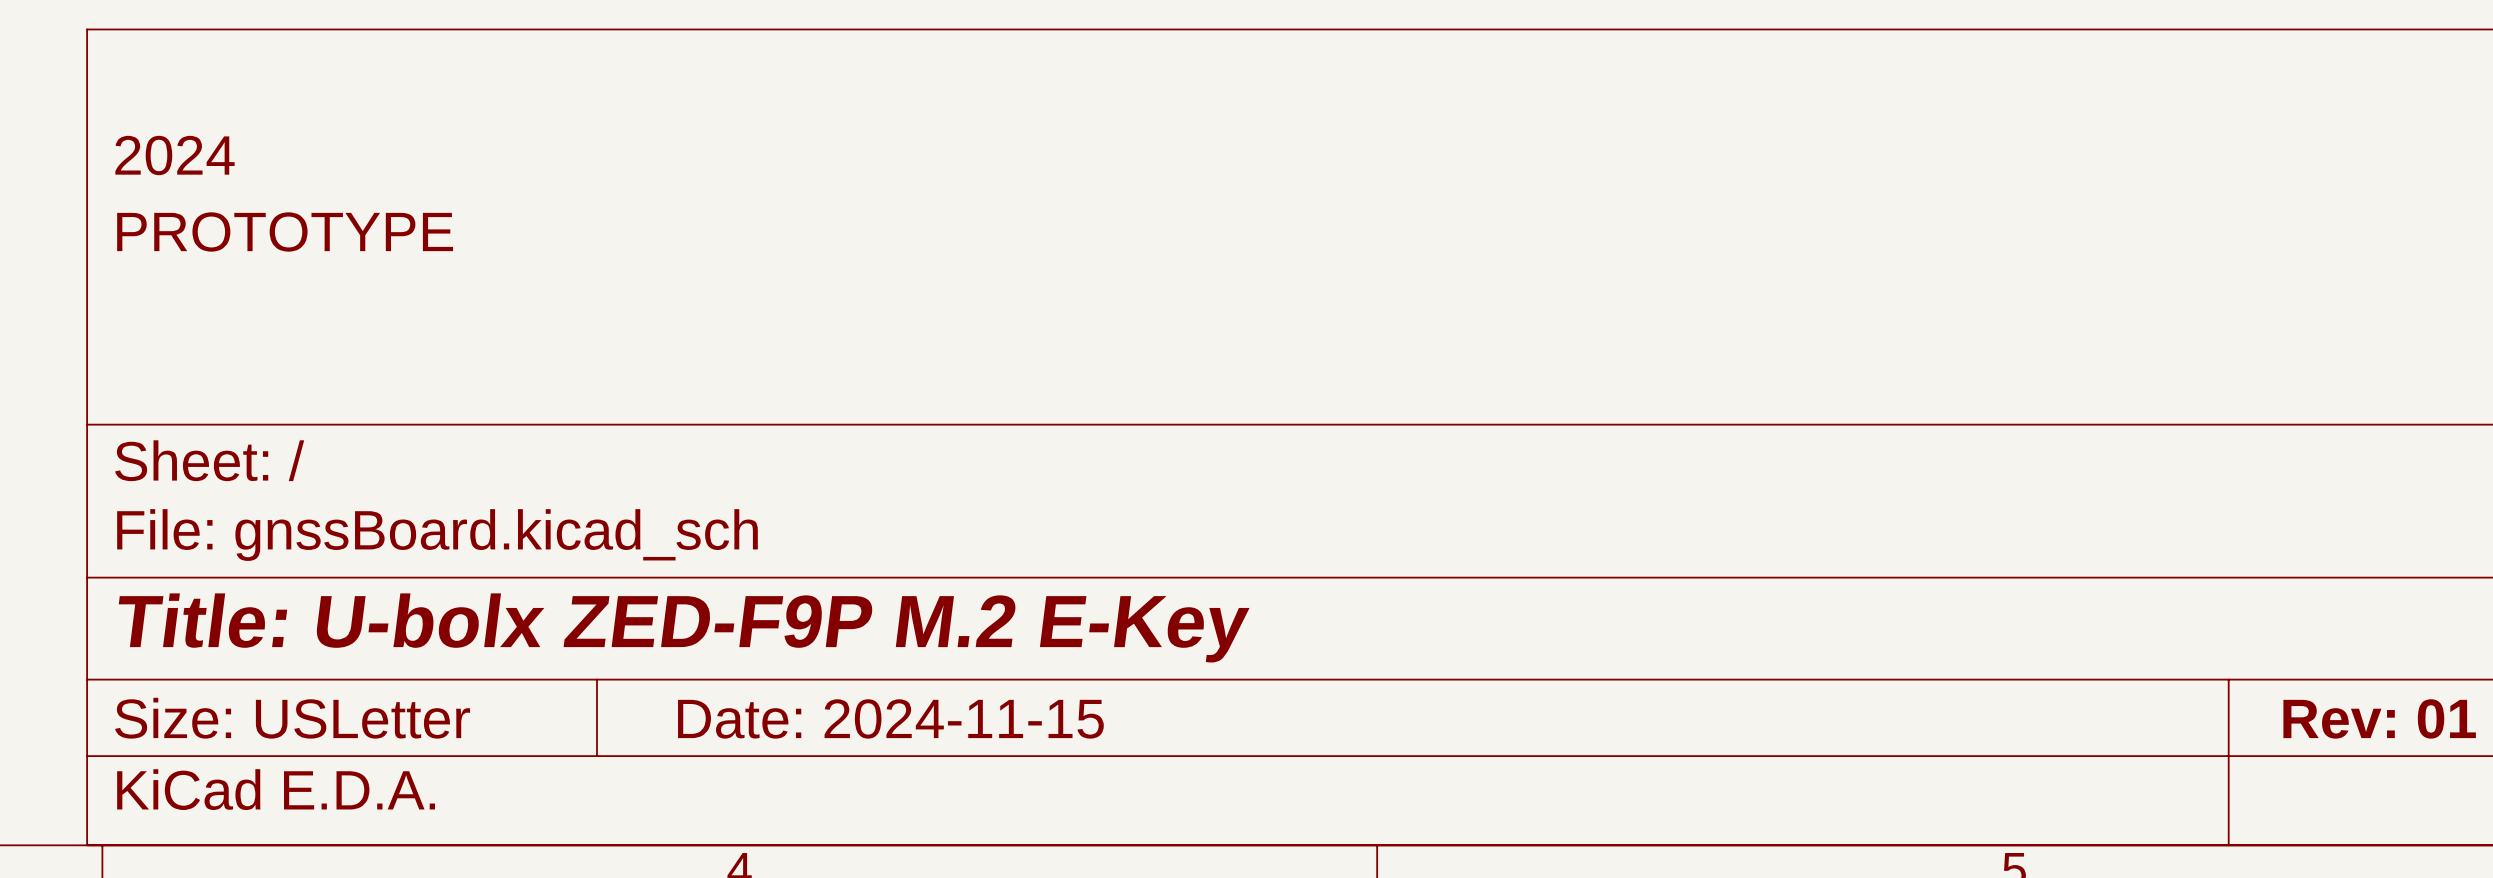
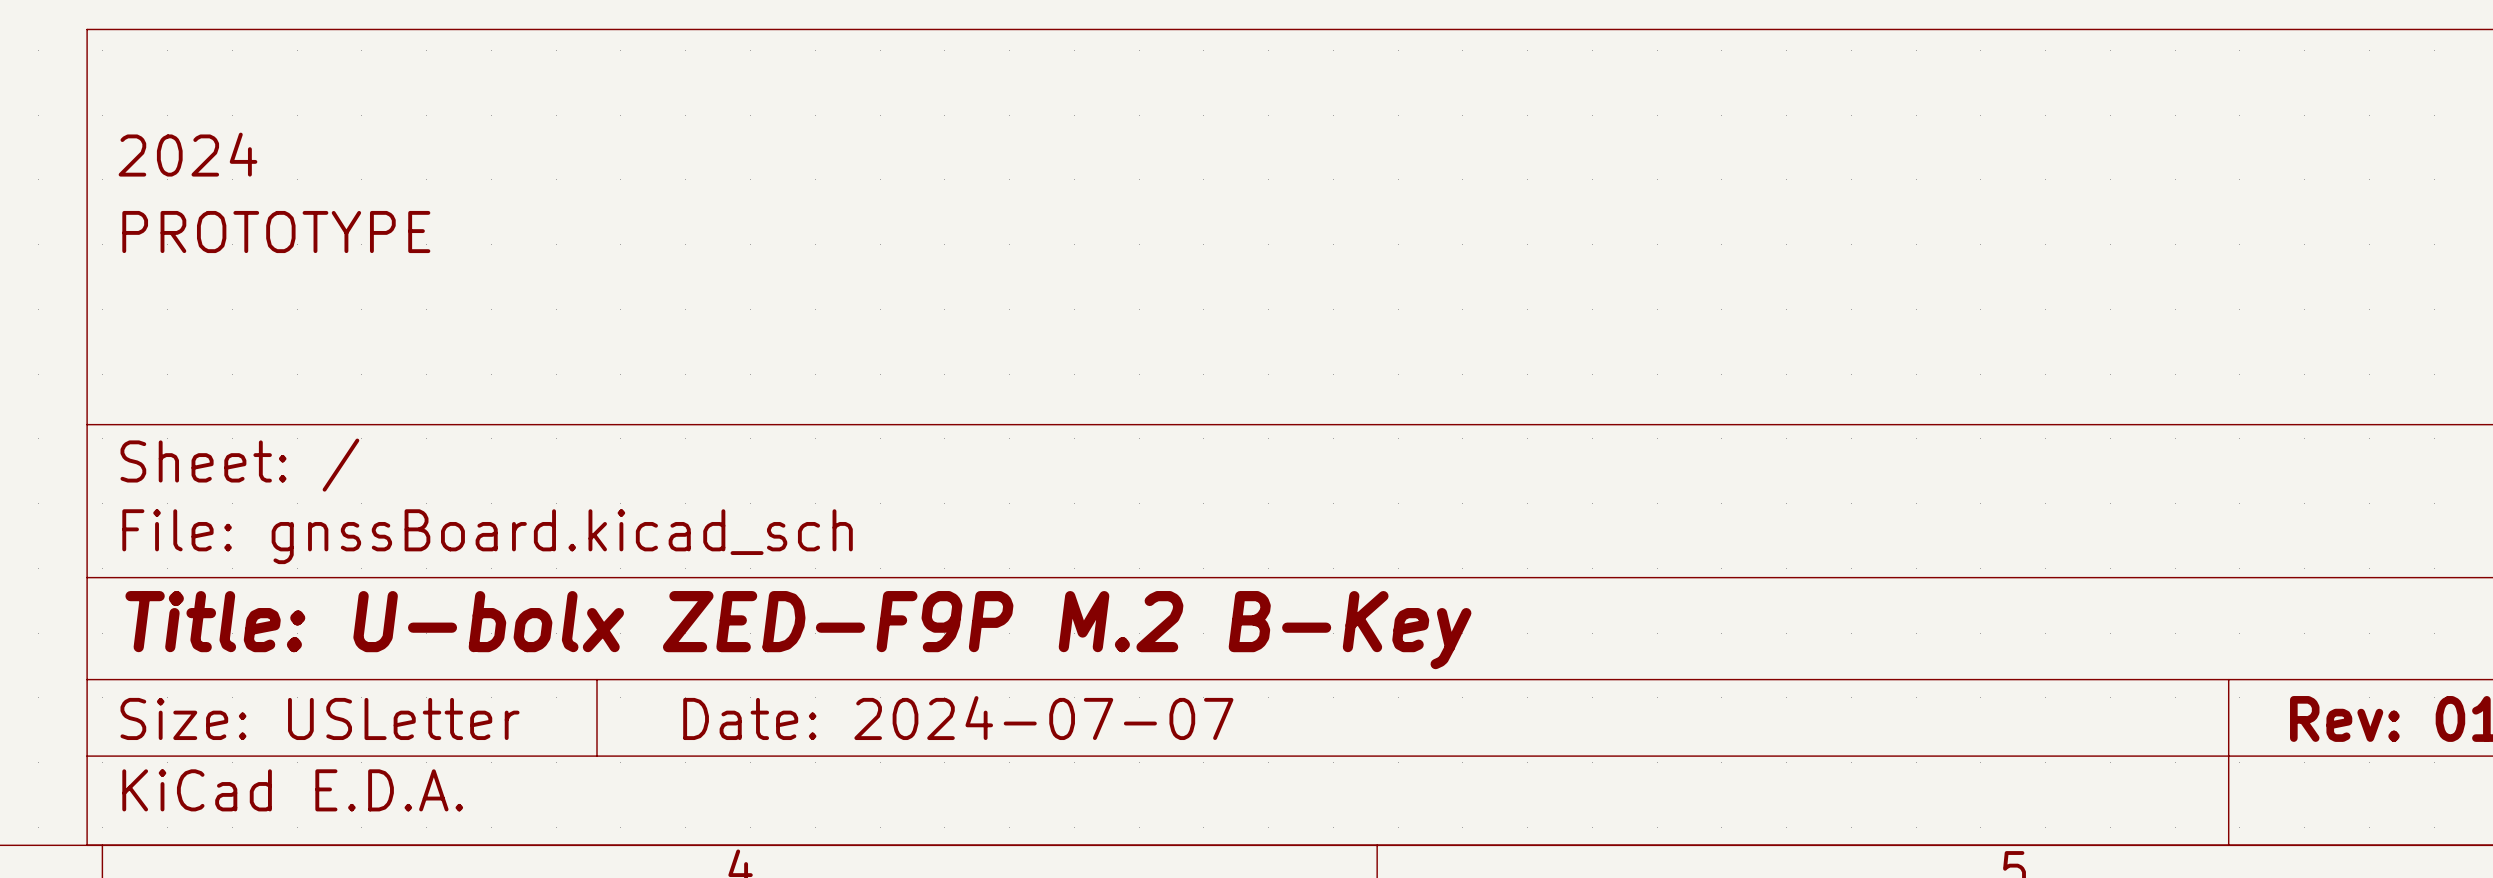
title block: Title: U-bolx ZED-F9P M.2 E-Key (684, 627) -> Title: U-bolx ZED-F9P M.2 B-Key (798, 630)
title block: Date: 2024-11-15 (890, 718) -> Date: 2024-07-07 (958, 718)

